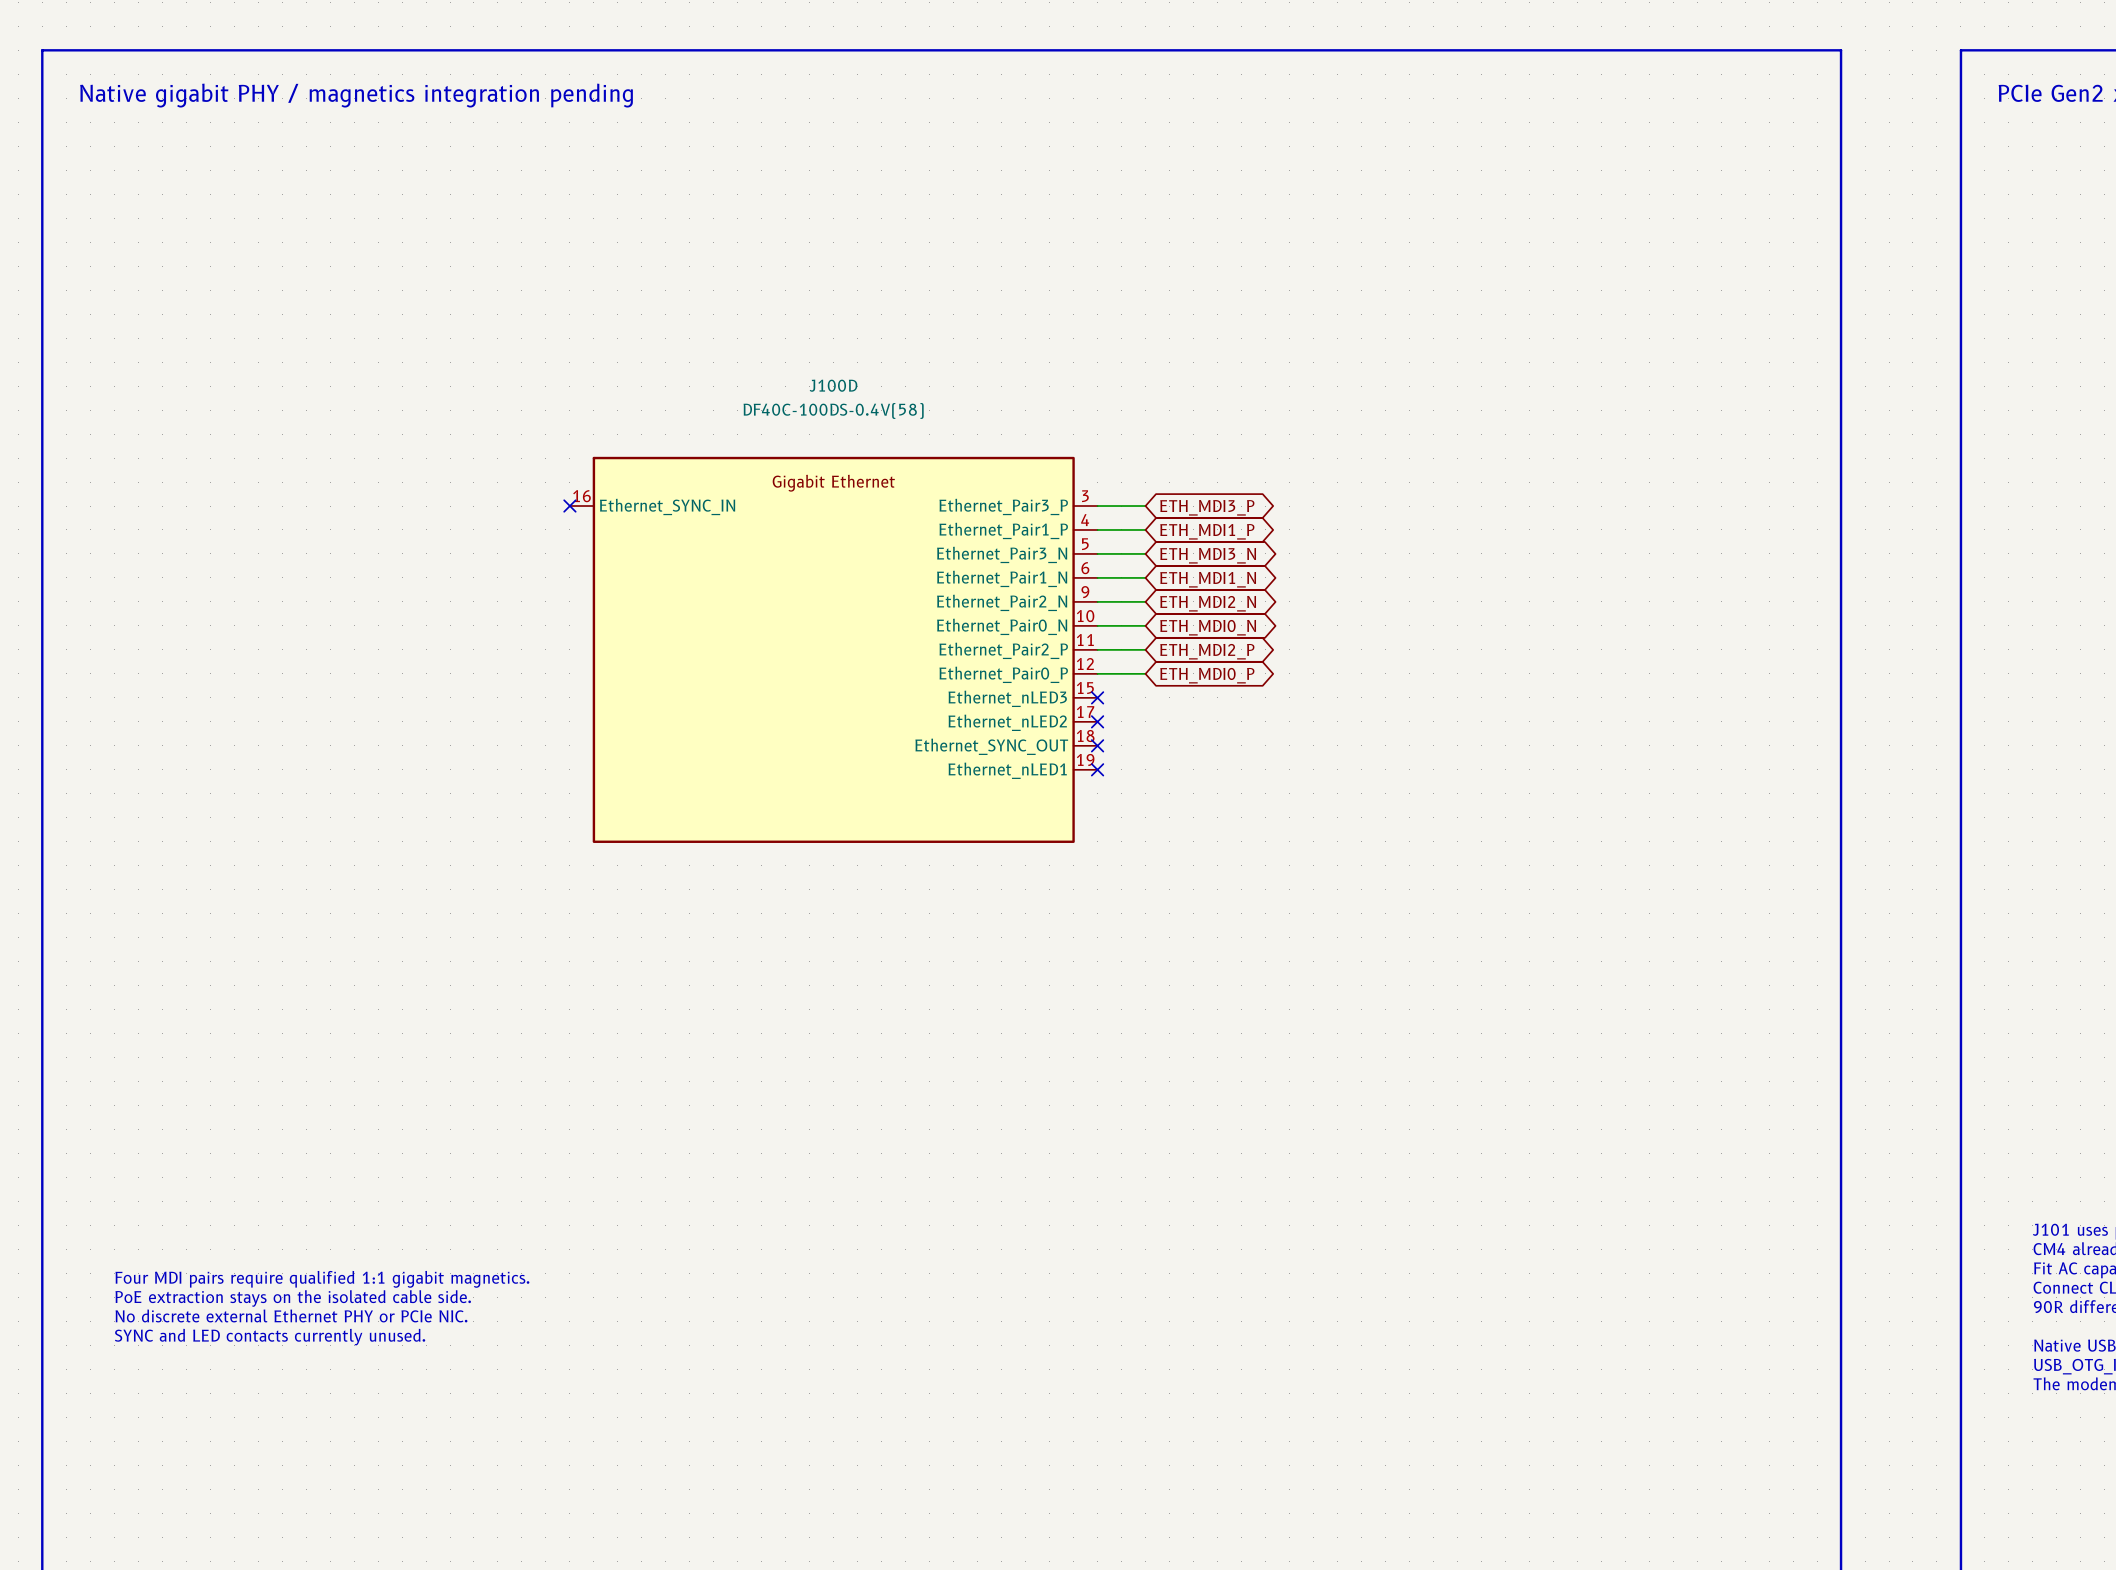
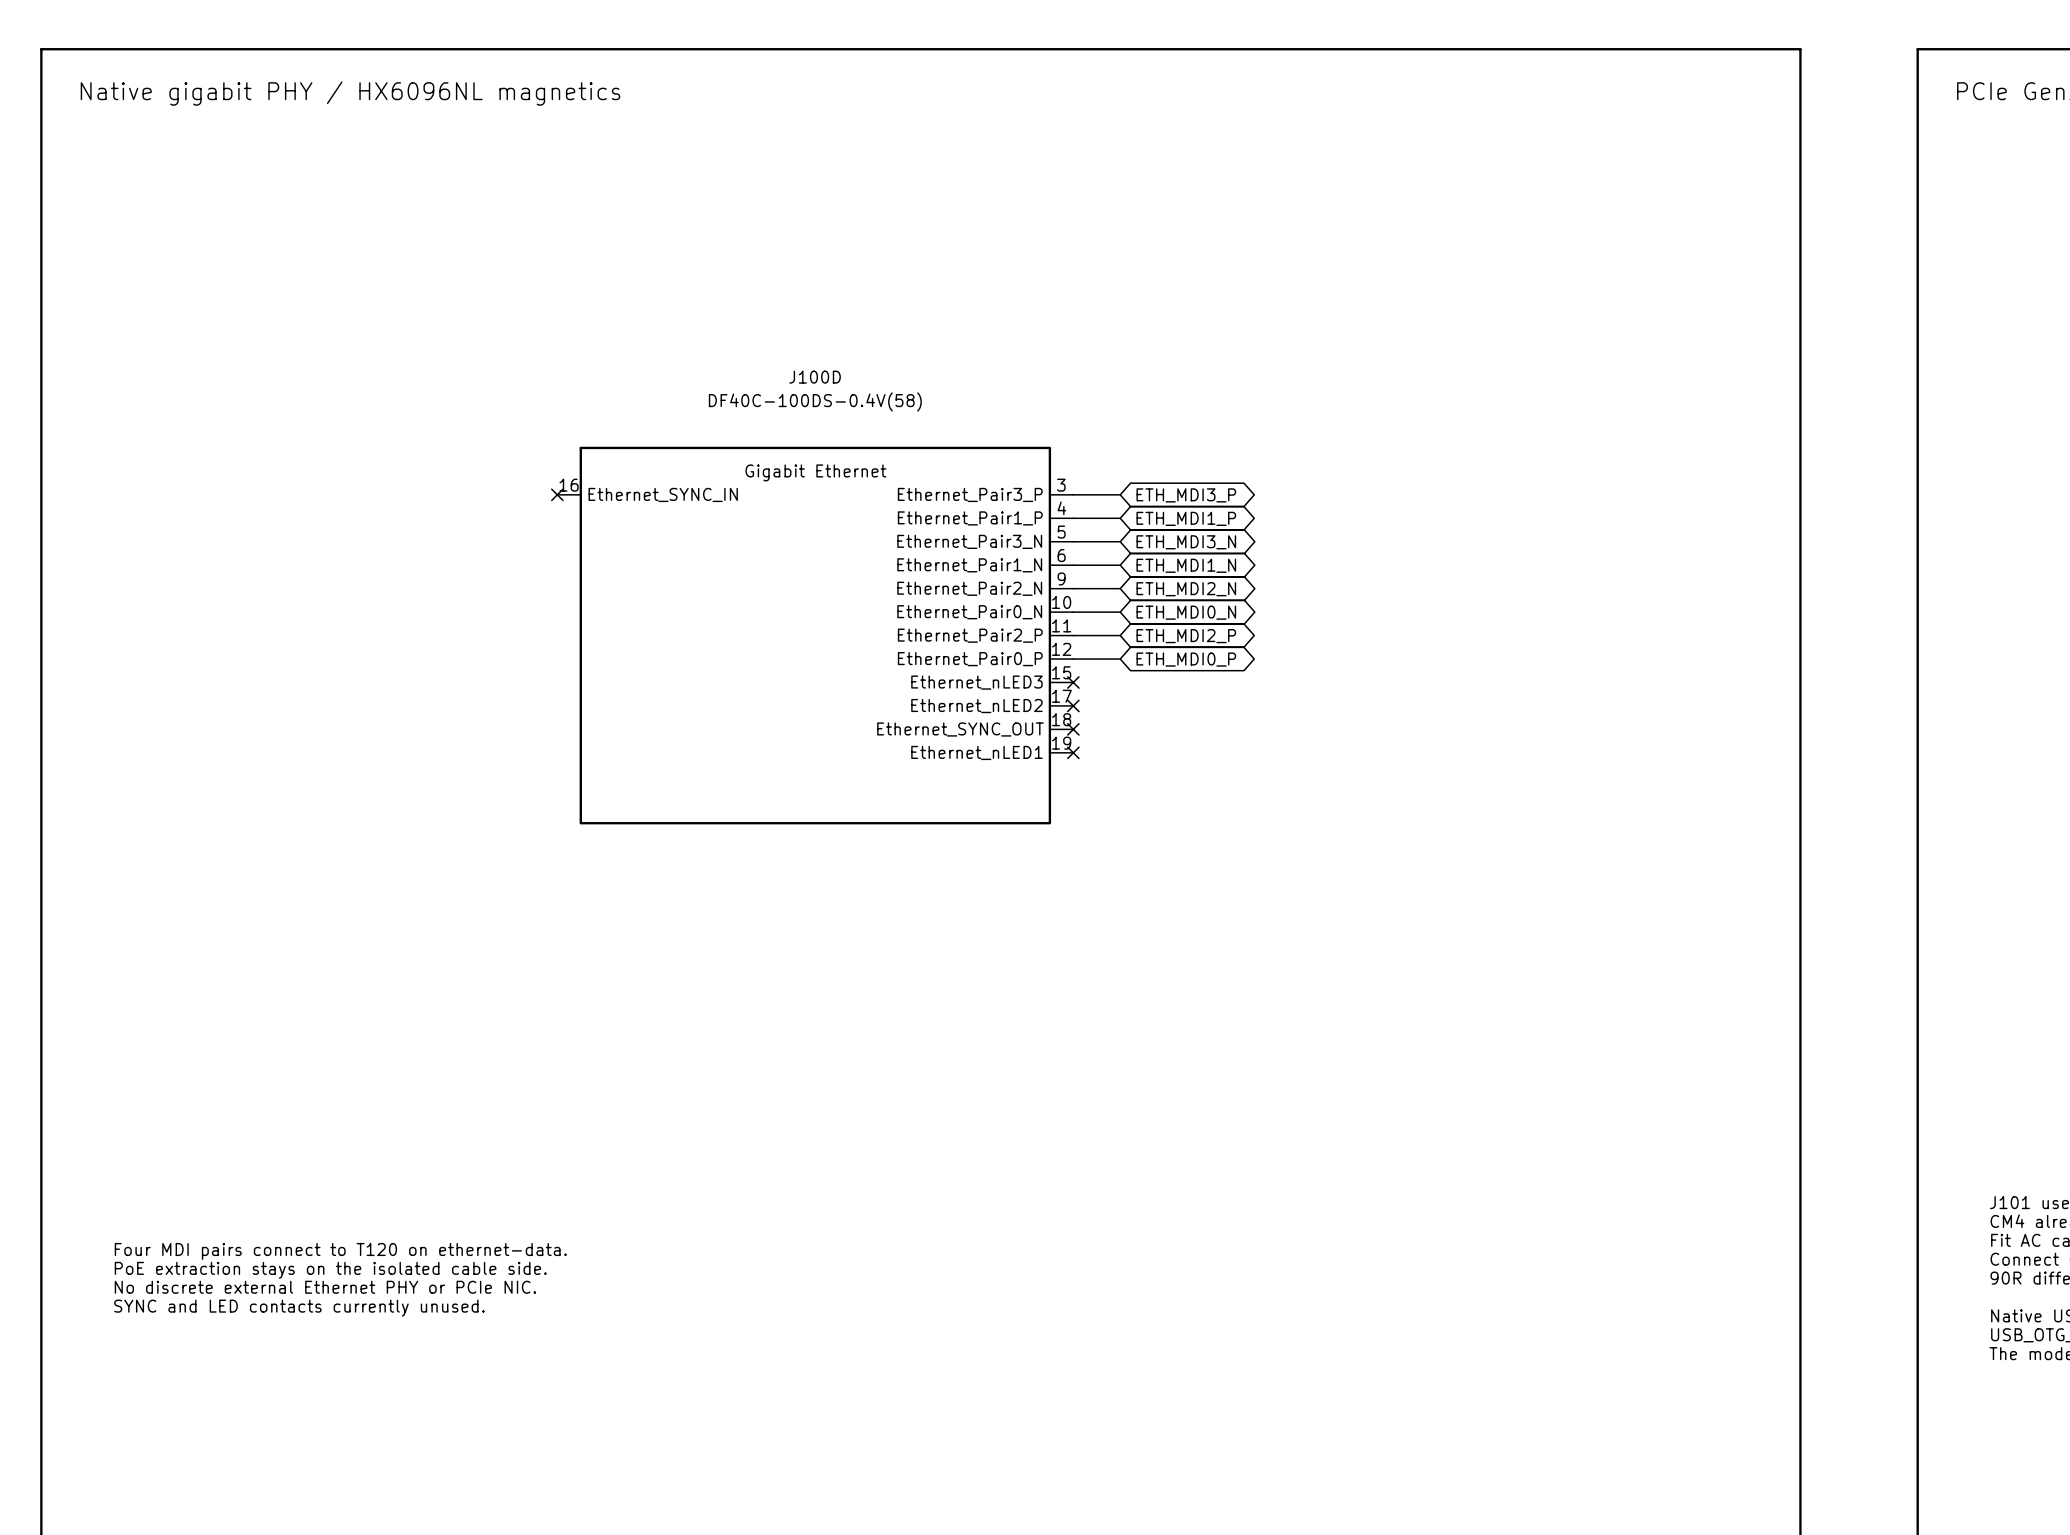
text: Native gigabit PHY / magnetics integration pending (356, 95) -> Native gigabit PHY / HX6096NL magnetics (350, 93)
text: Four MDI pairs require qualified 1:1 gigabit magnetics. (322, 1279) -> Four MDI pairs connect to T120 on ethernet-data. (340, 1251)

